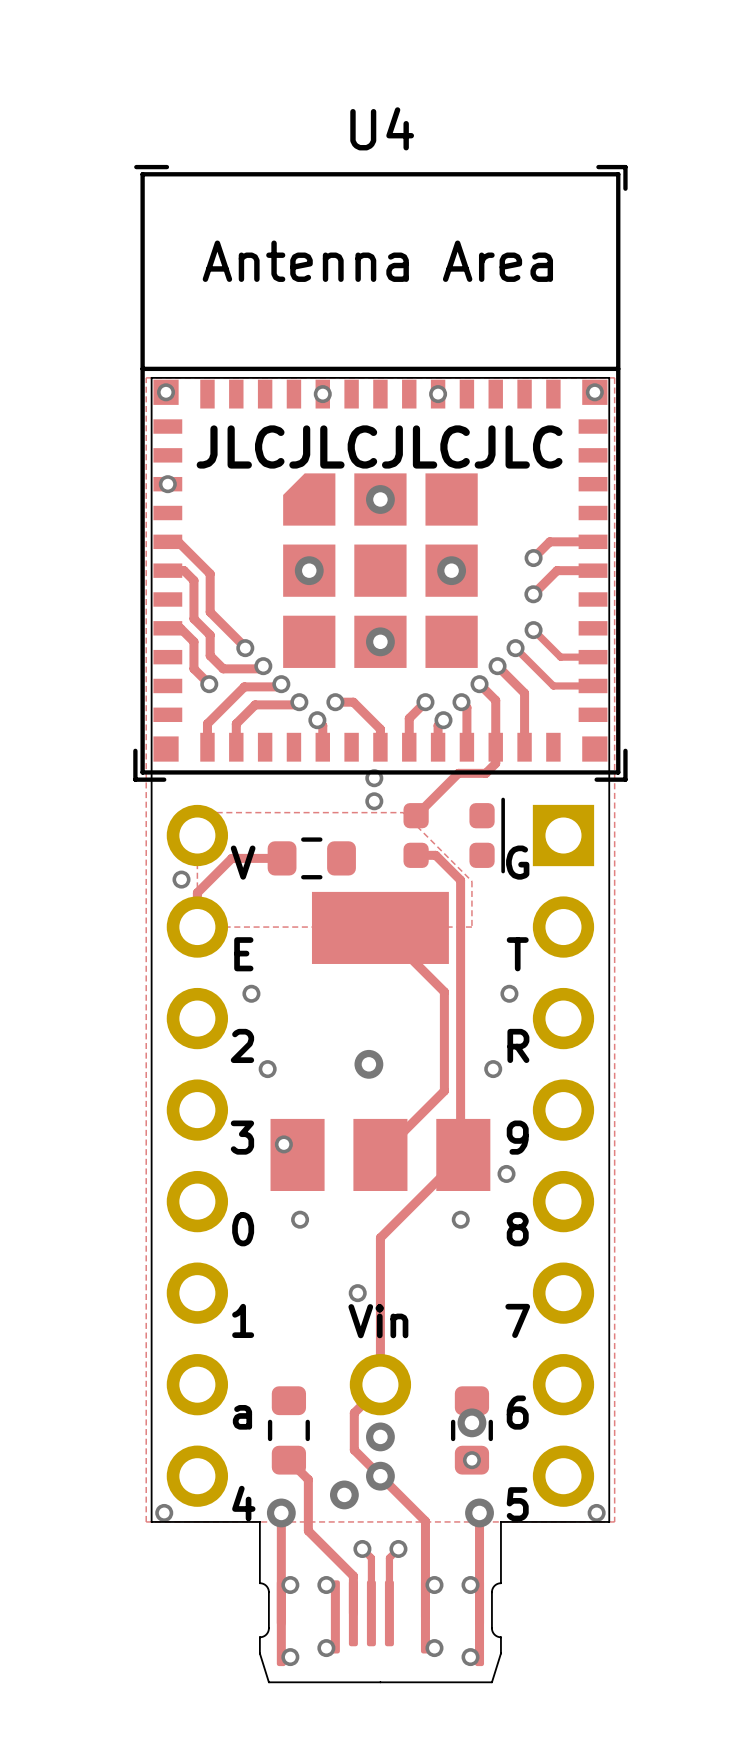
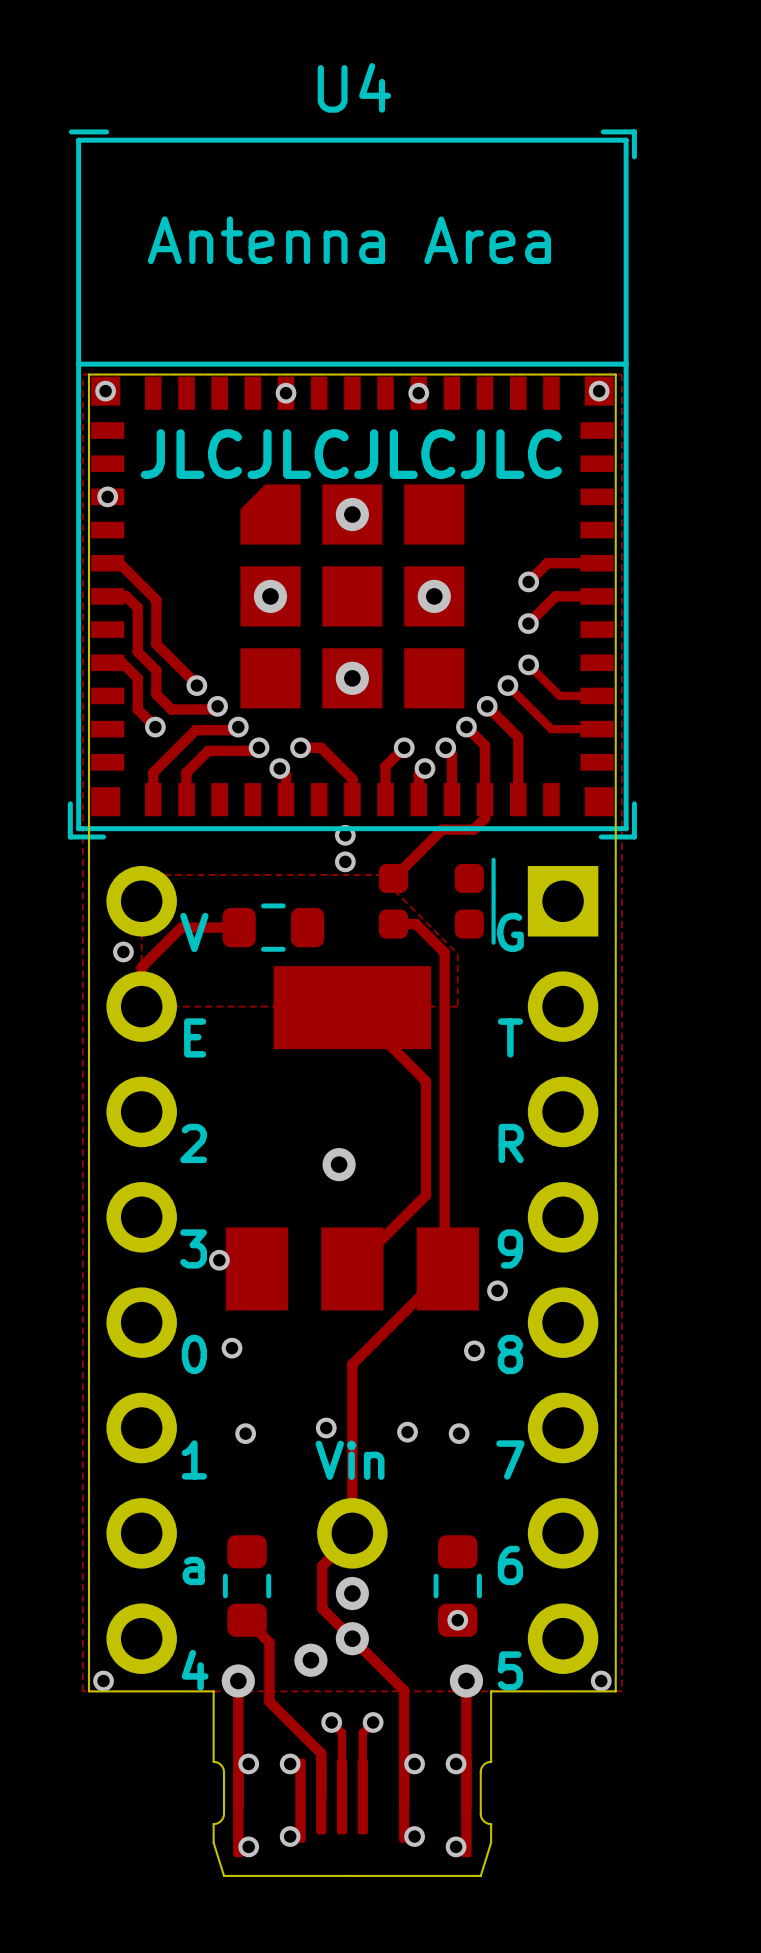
via: (251, 993) -> none
via: (509, 993) -> none
via: (267, 1069) -> none
via: (493, 1069) -> none
via position: (283, 1144) -> (219, 1260)
via position: (300, 1219) -> (232, 1348)
via position: (460, 1219) -> (474, 1350)
via: none -> (407, 1432)
via: none -> (245, 1433)
via: none -> (459, 1433)
via: (471, 1422) -> none

